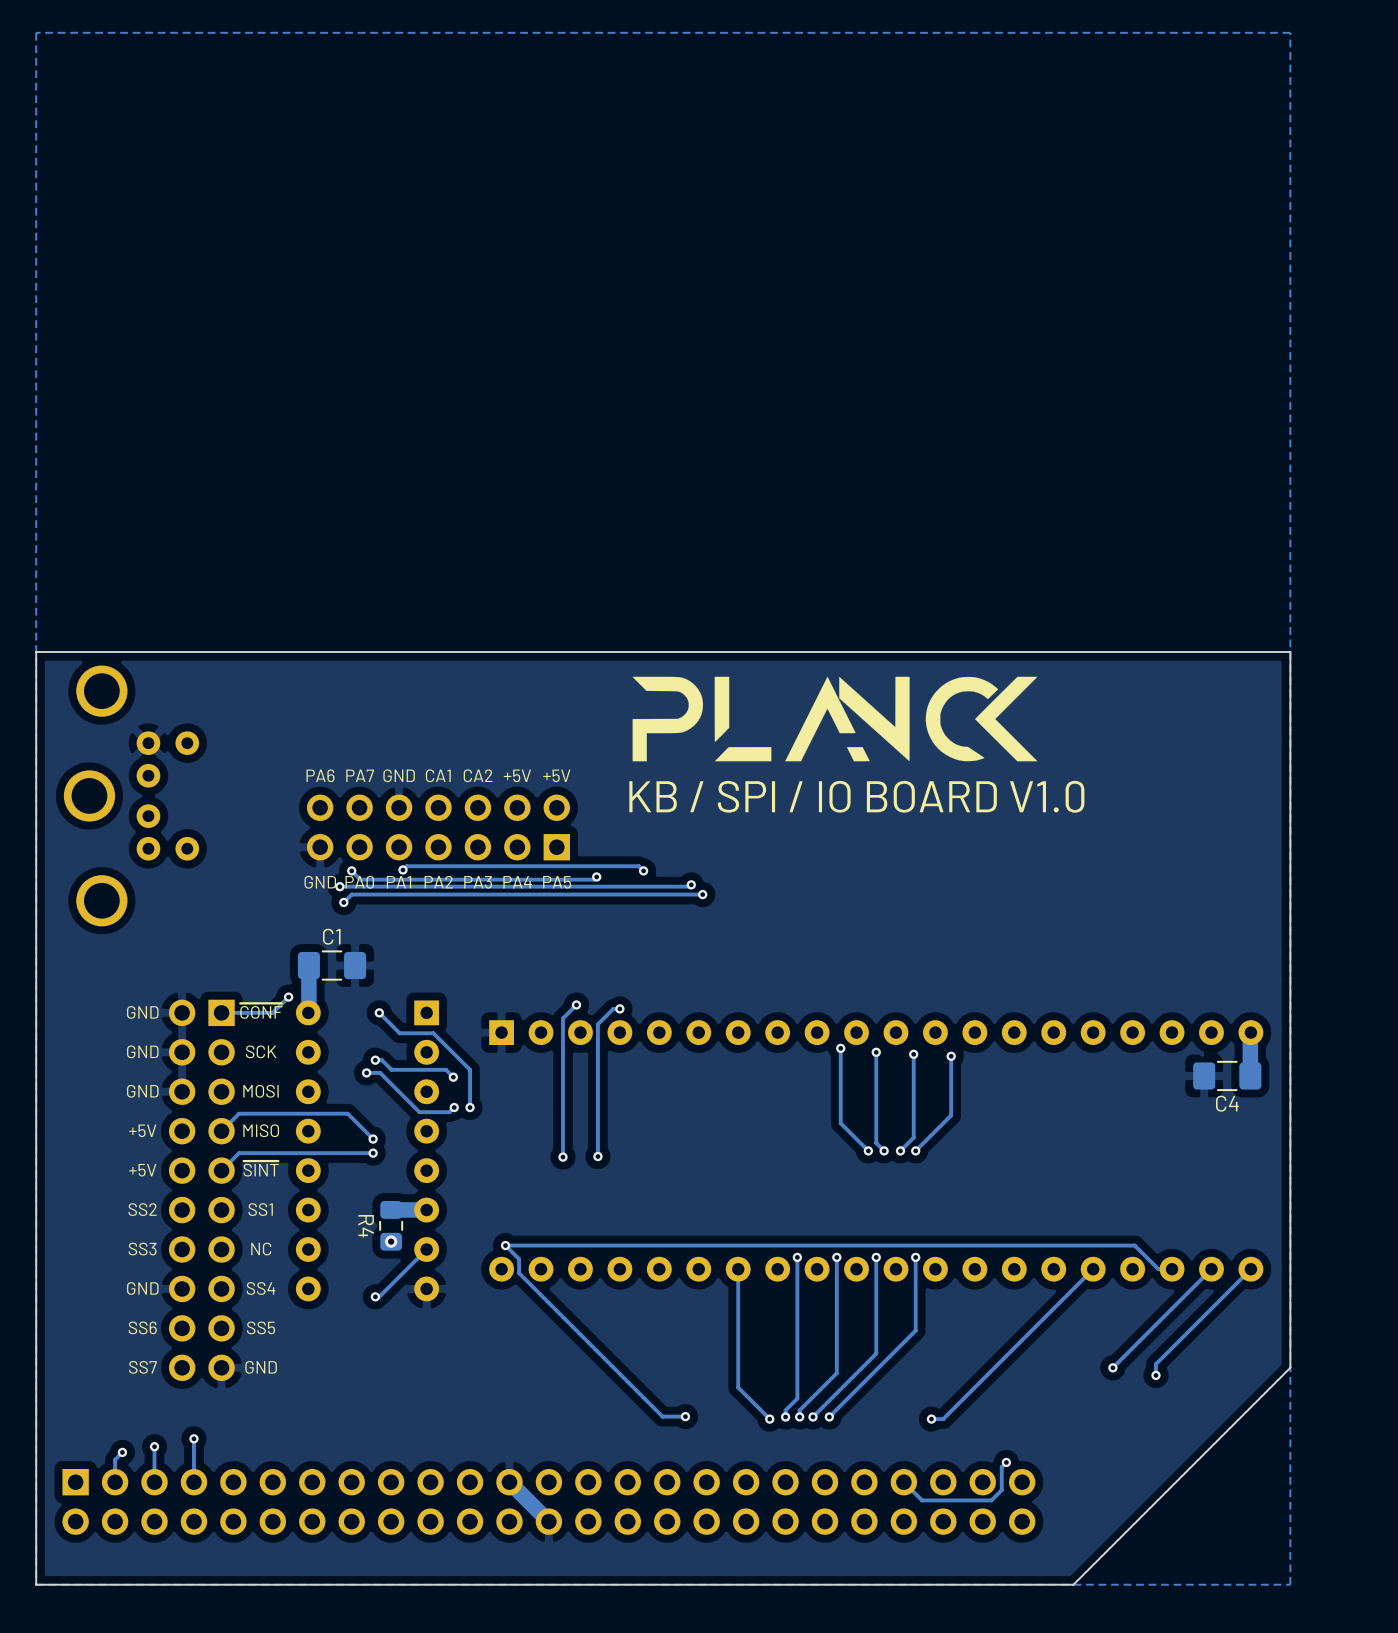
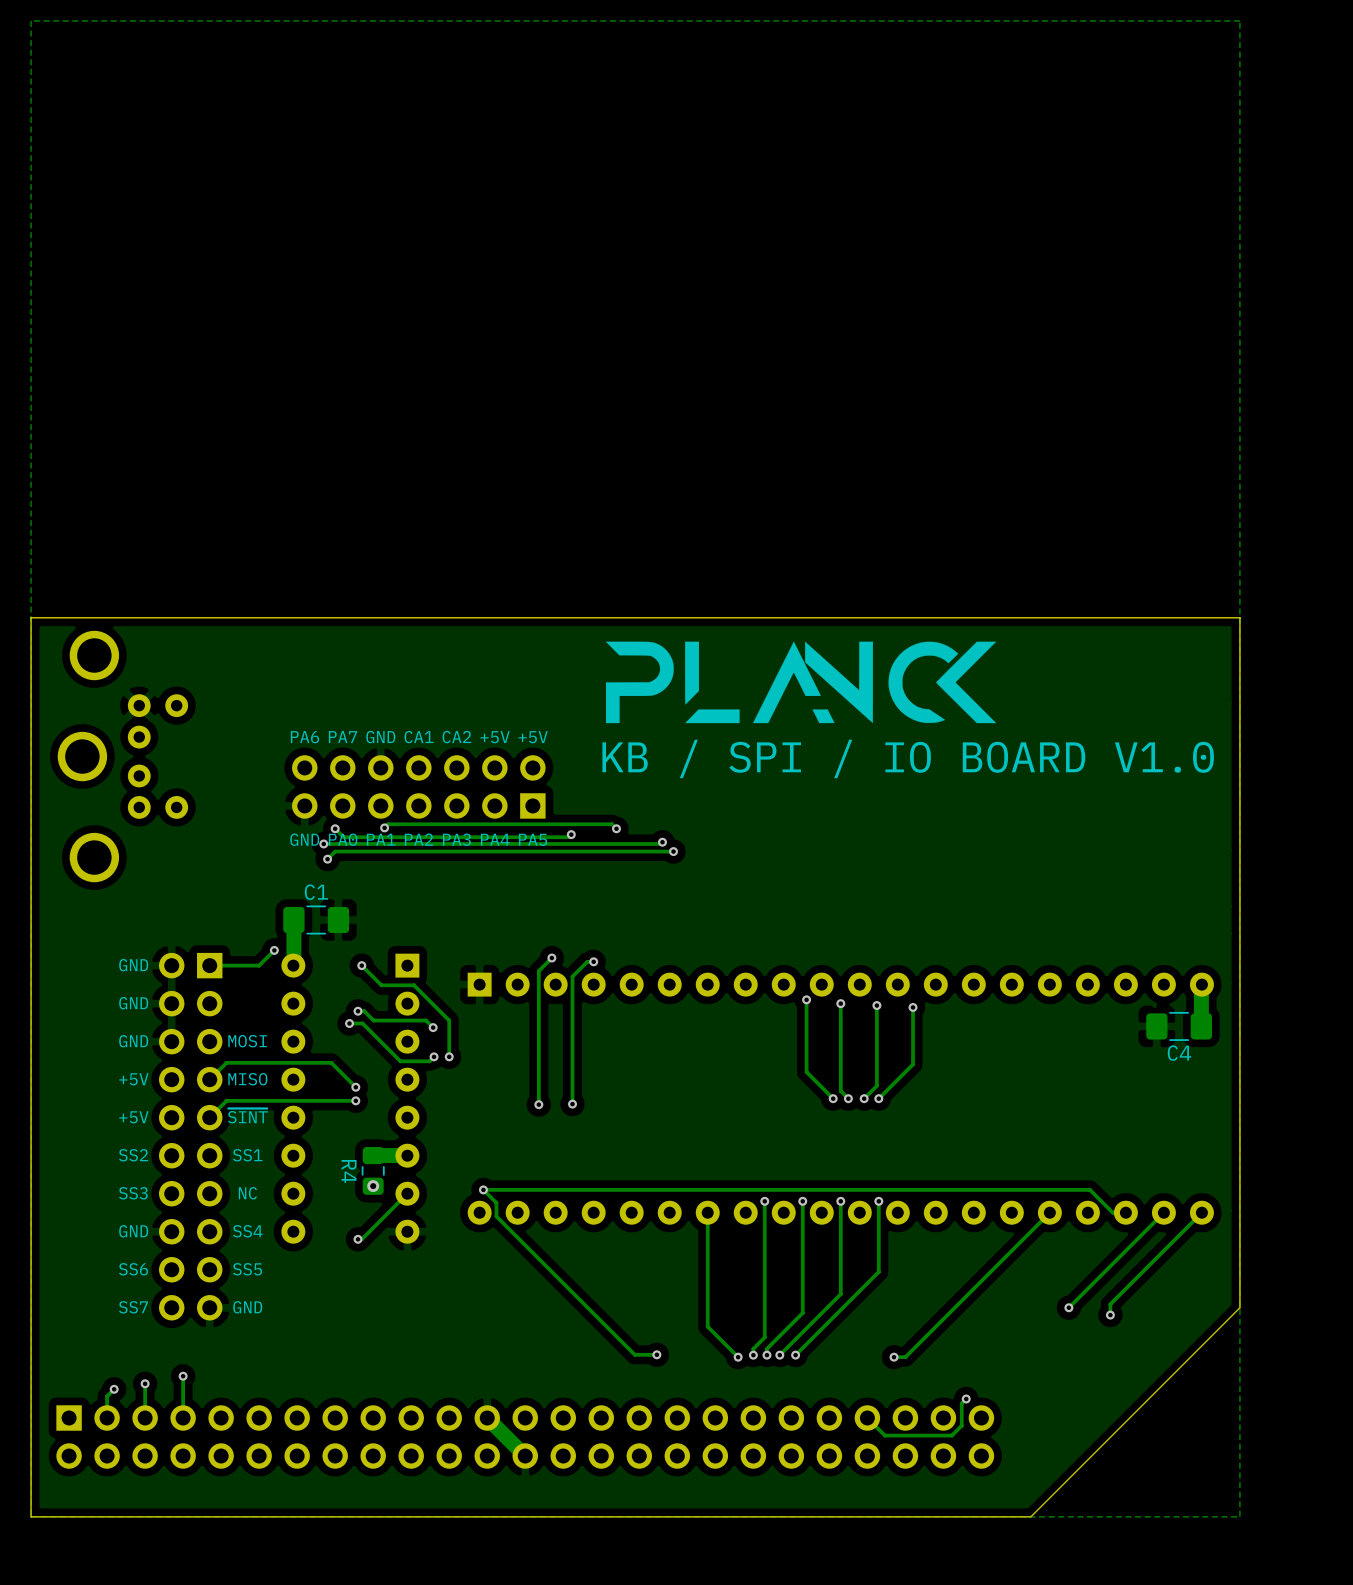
text: ~{CONF} (261, 1011) -> none
text: SCK (261, 1051) -> none

